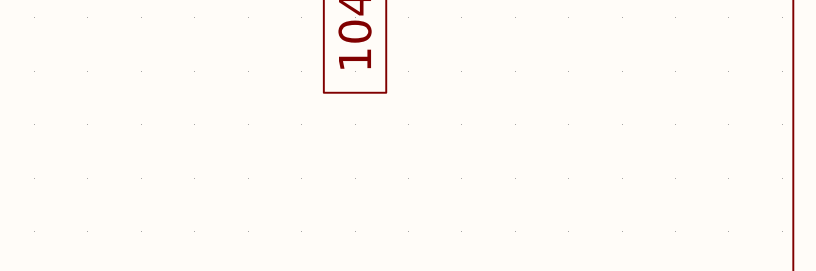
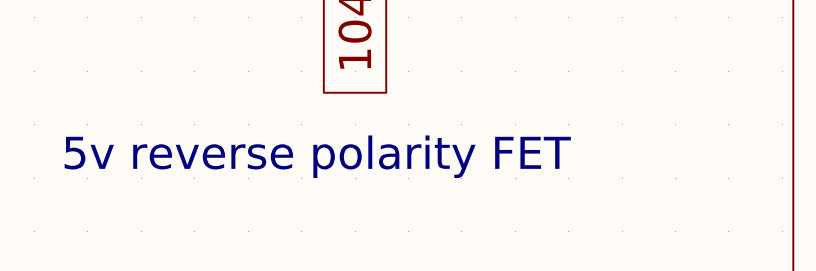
text: none -> 5v reverse polarity FET (317, 156)

